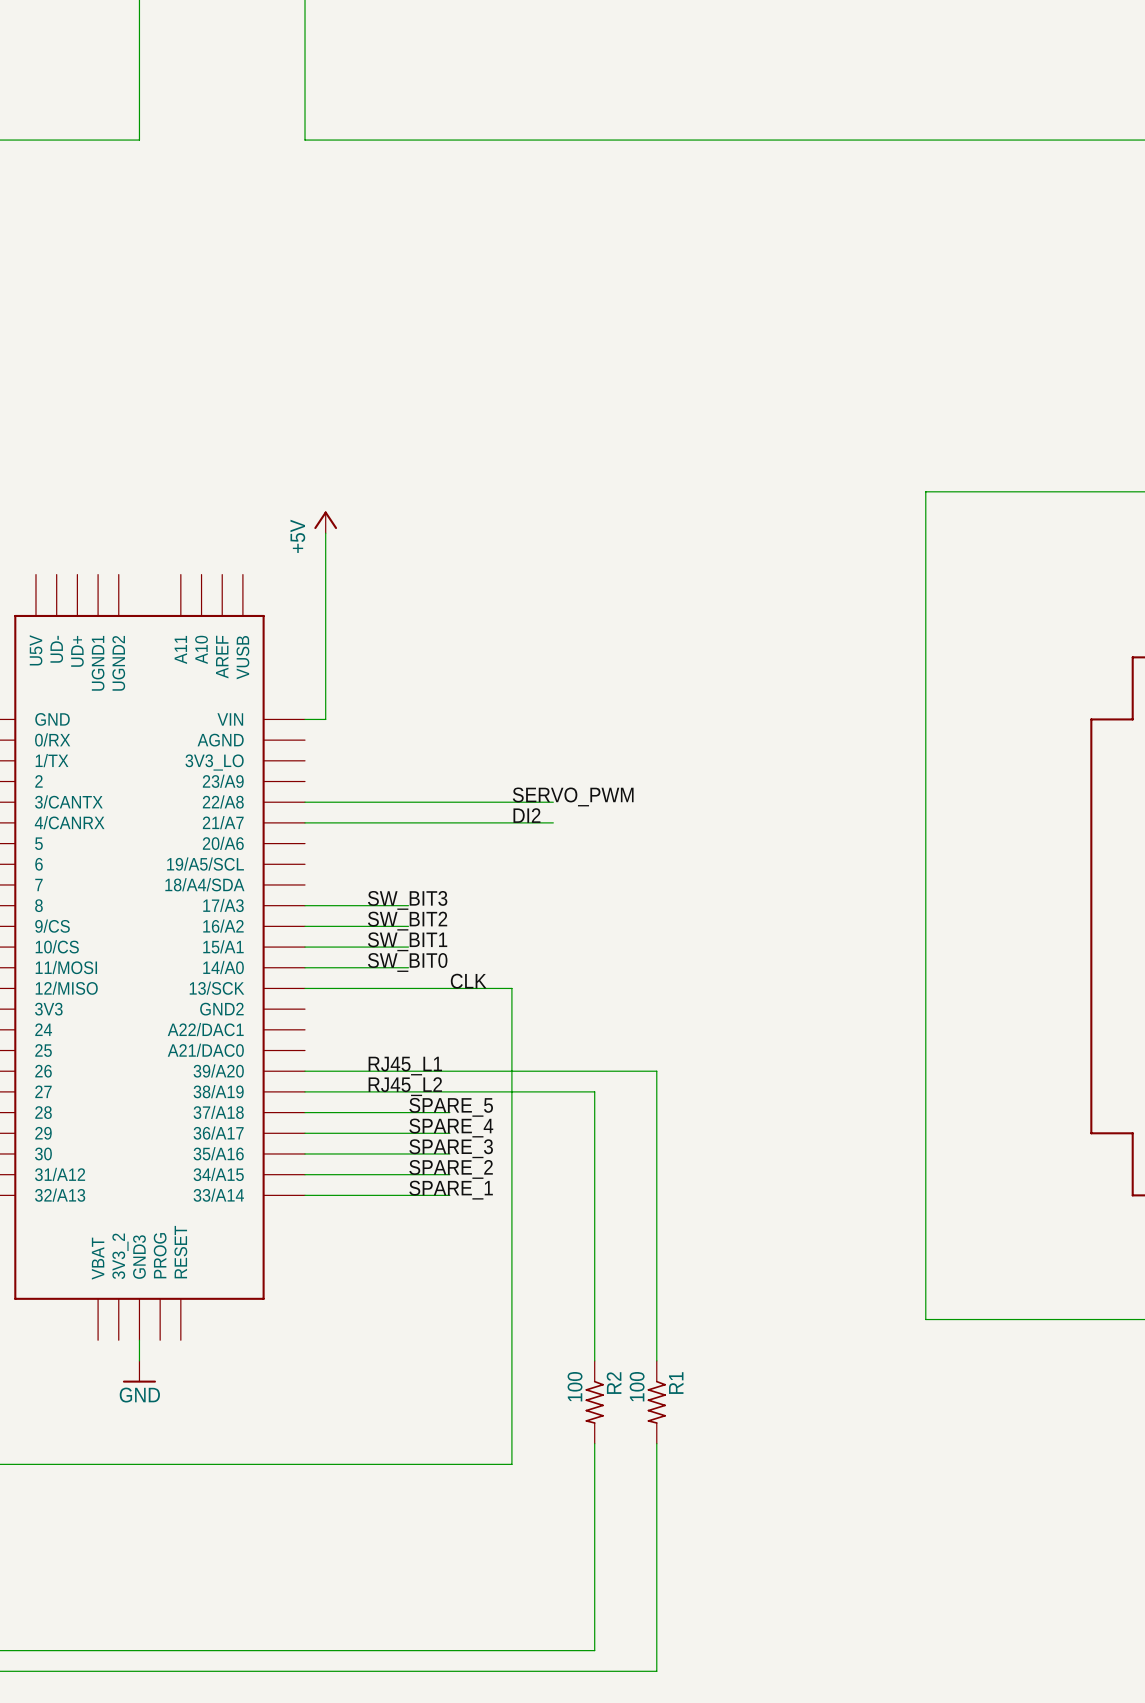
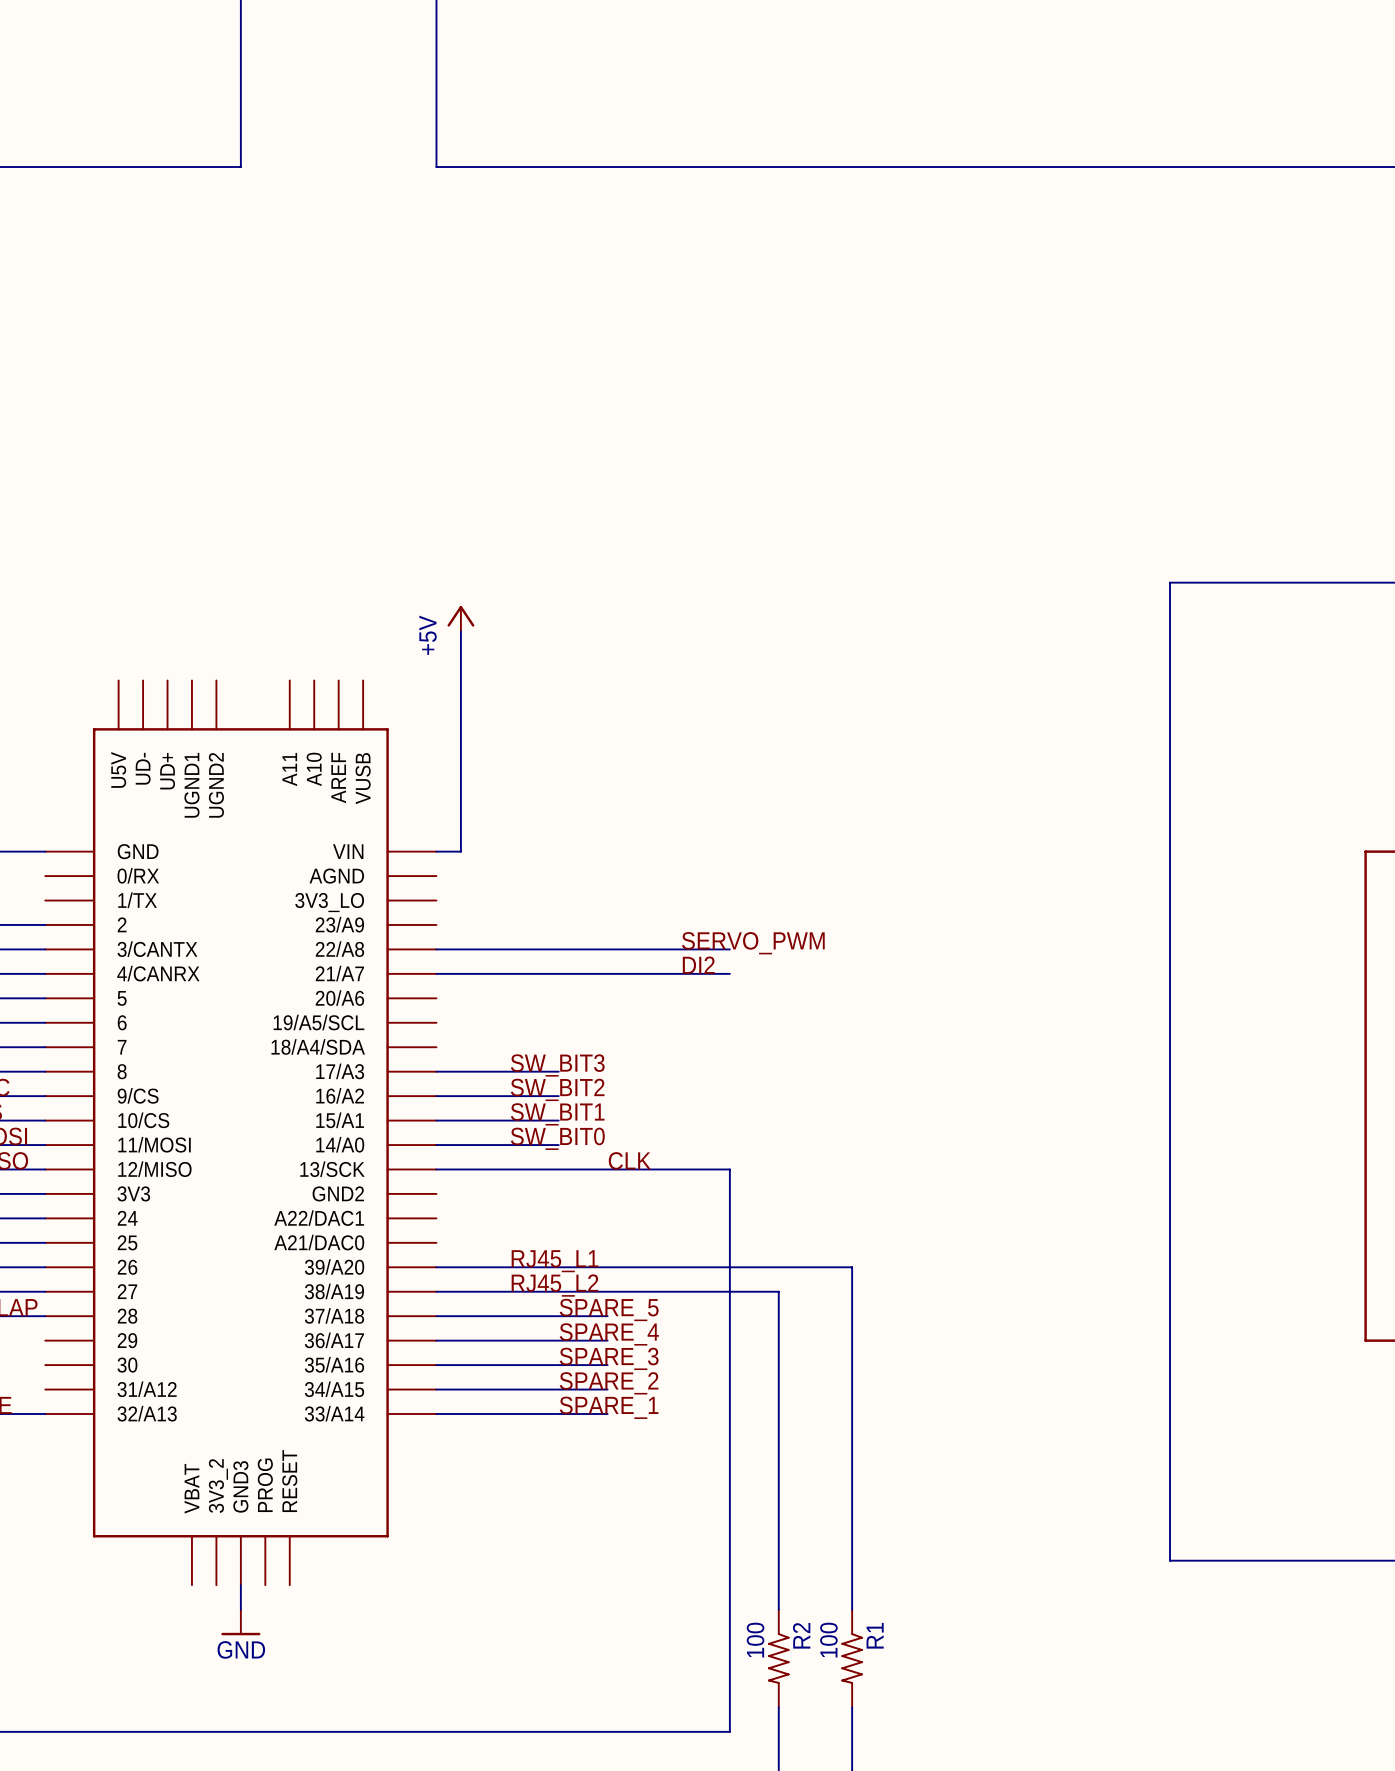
wire: (511, 988) (511, 1464) -> (680, 1169) (729, 1169) (729, 1731) (680, 1731)

